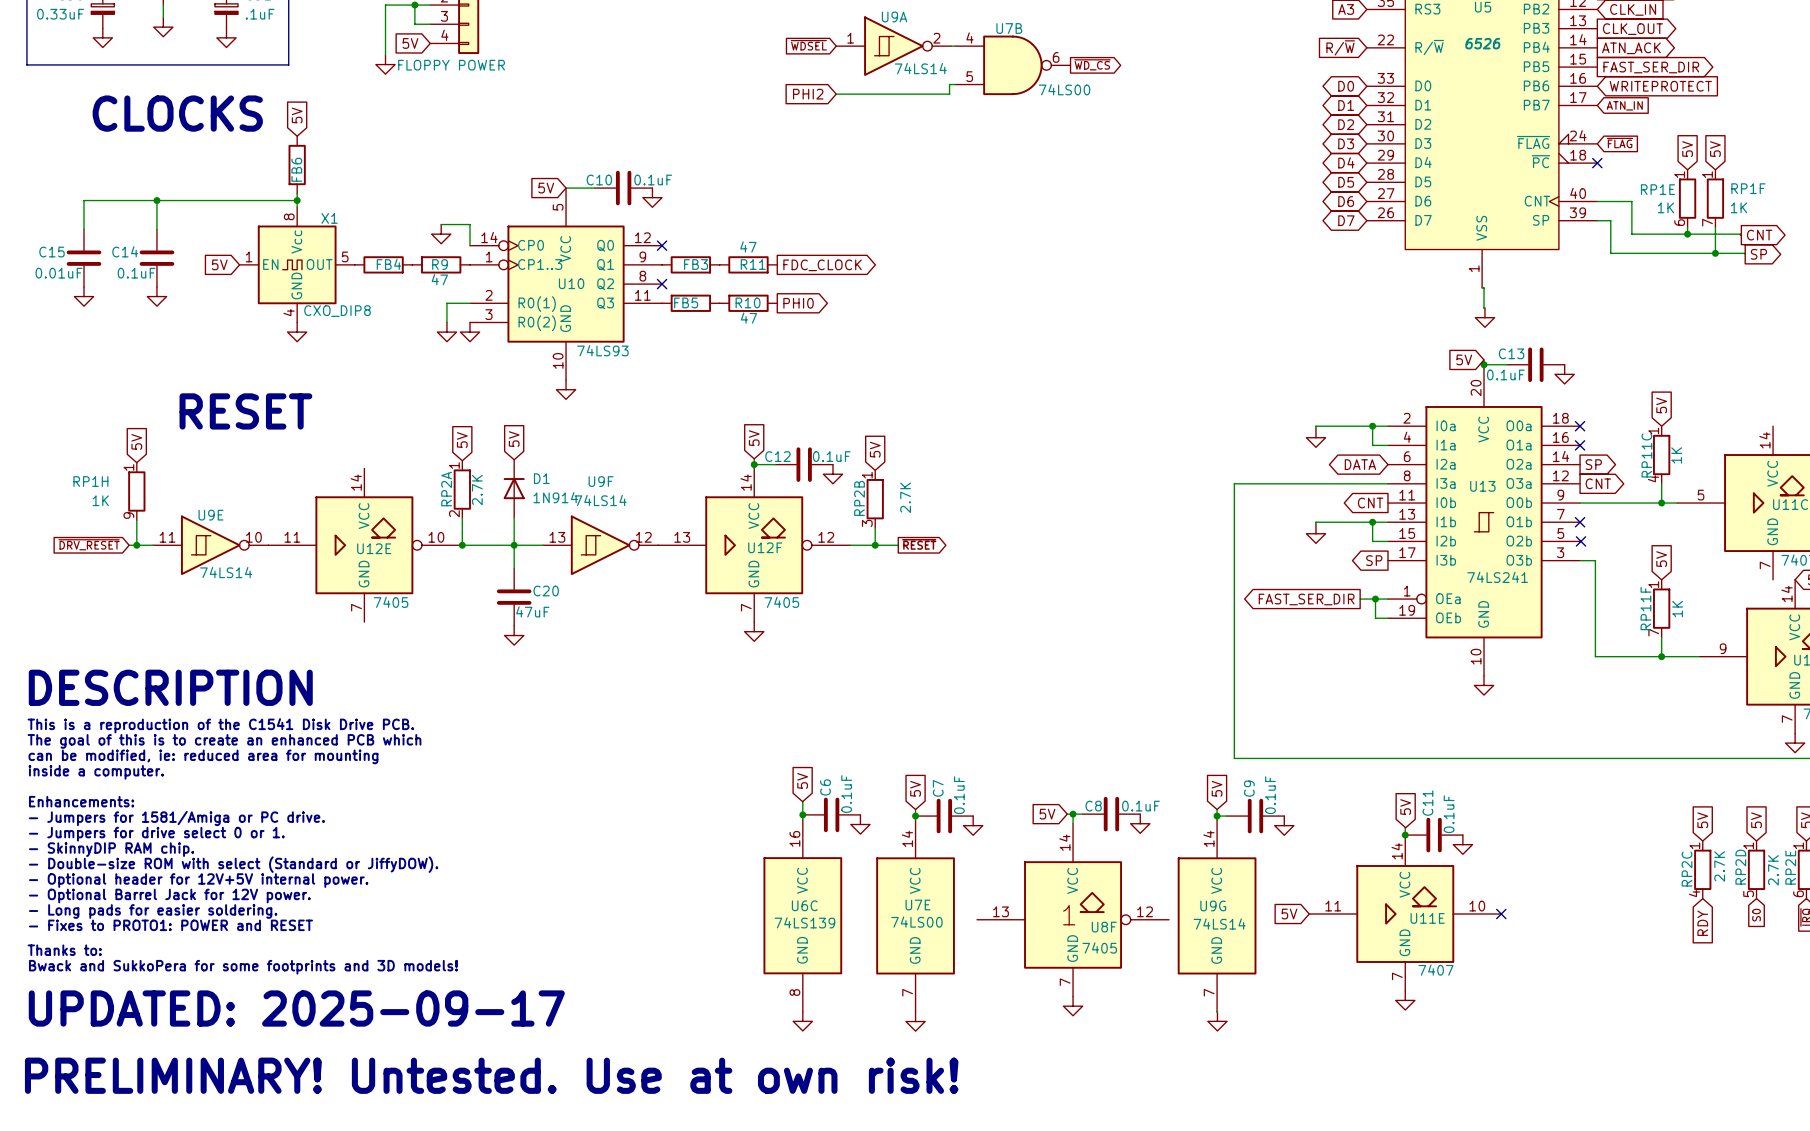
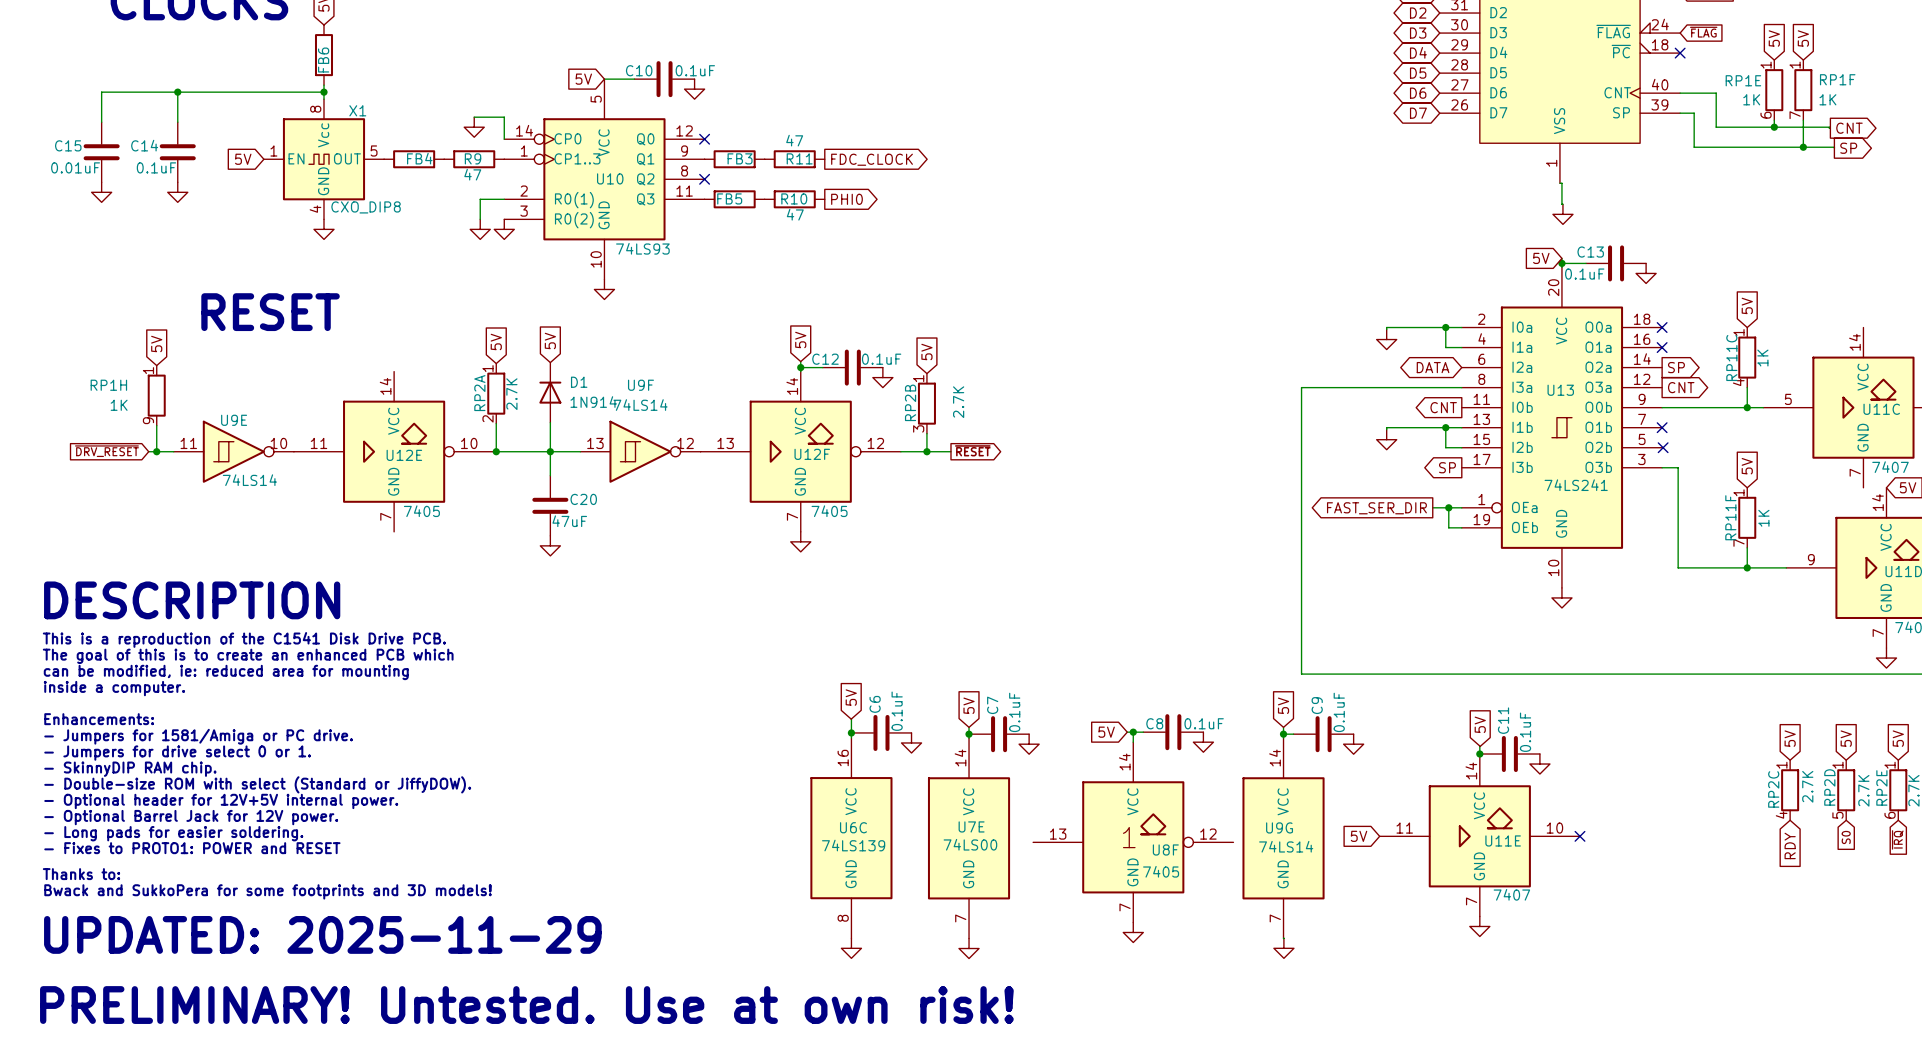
text: UPDATED: 2025-09-17 (296, 1008) -> UPDATED: 2025-11-29 (322, 934)

